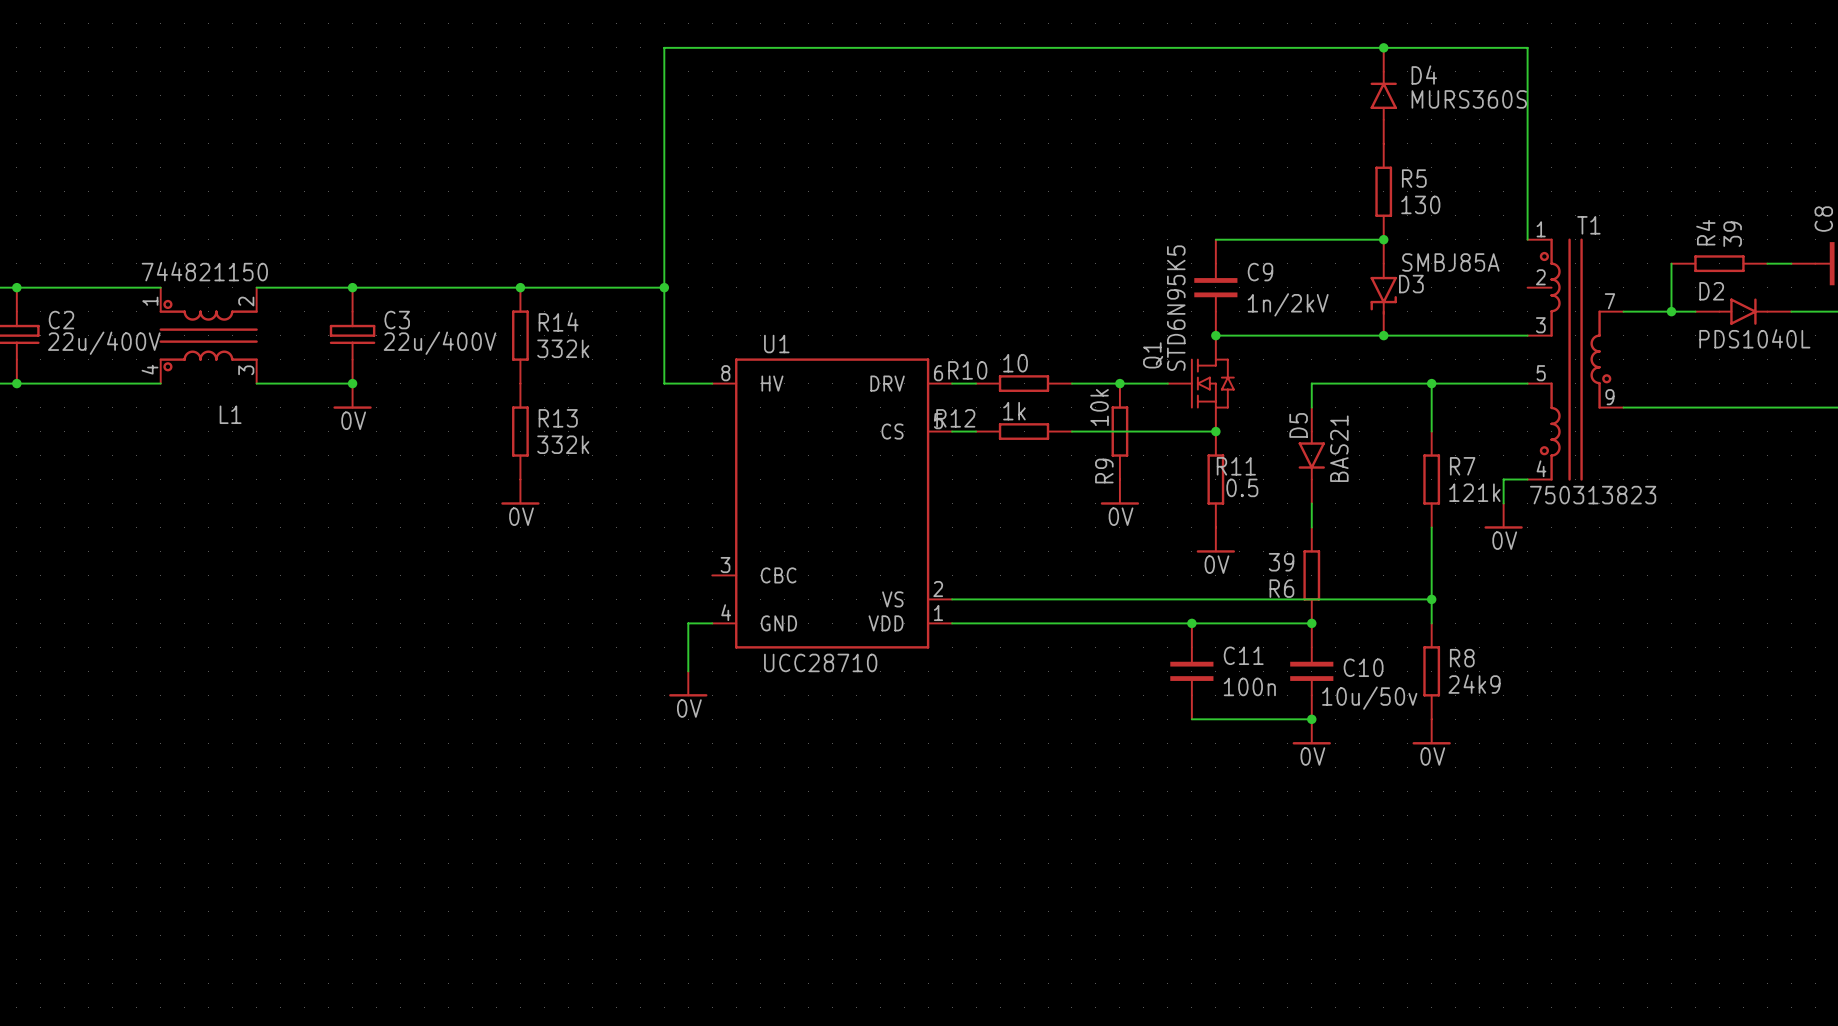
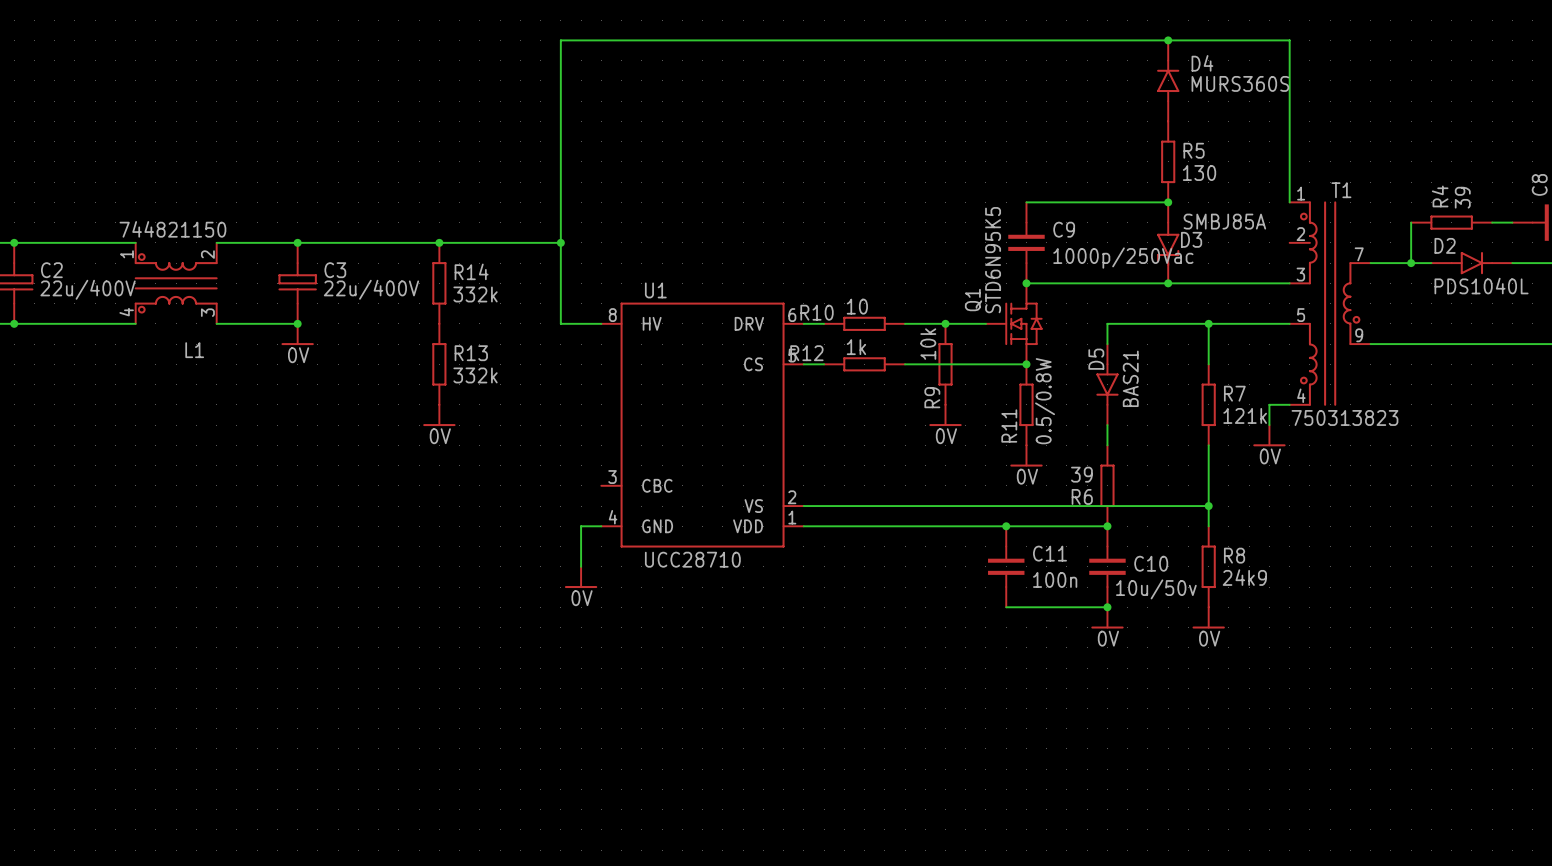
C9 value: 1n/2kV (1288, 304) -> 1000p/250Vac (1123, 258)
R11 name rotation: 0° (1236, 466) -> 90° counterclockwise (1009, 425)
R11 name position: R11 (1236, 466) -> R11 (1009, 425)
R11 value: 0.5 (1242, 487) -> 0.5/0.8W (1045, 401)

